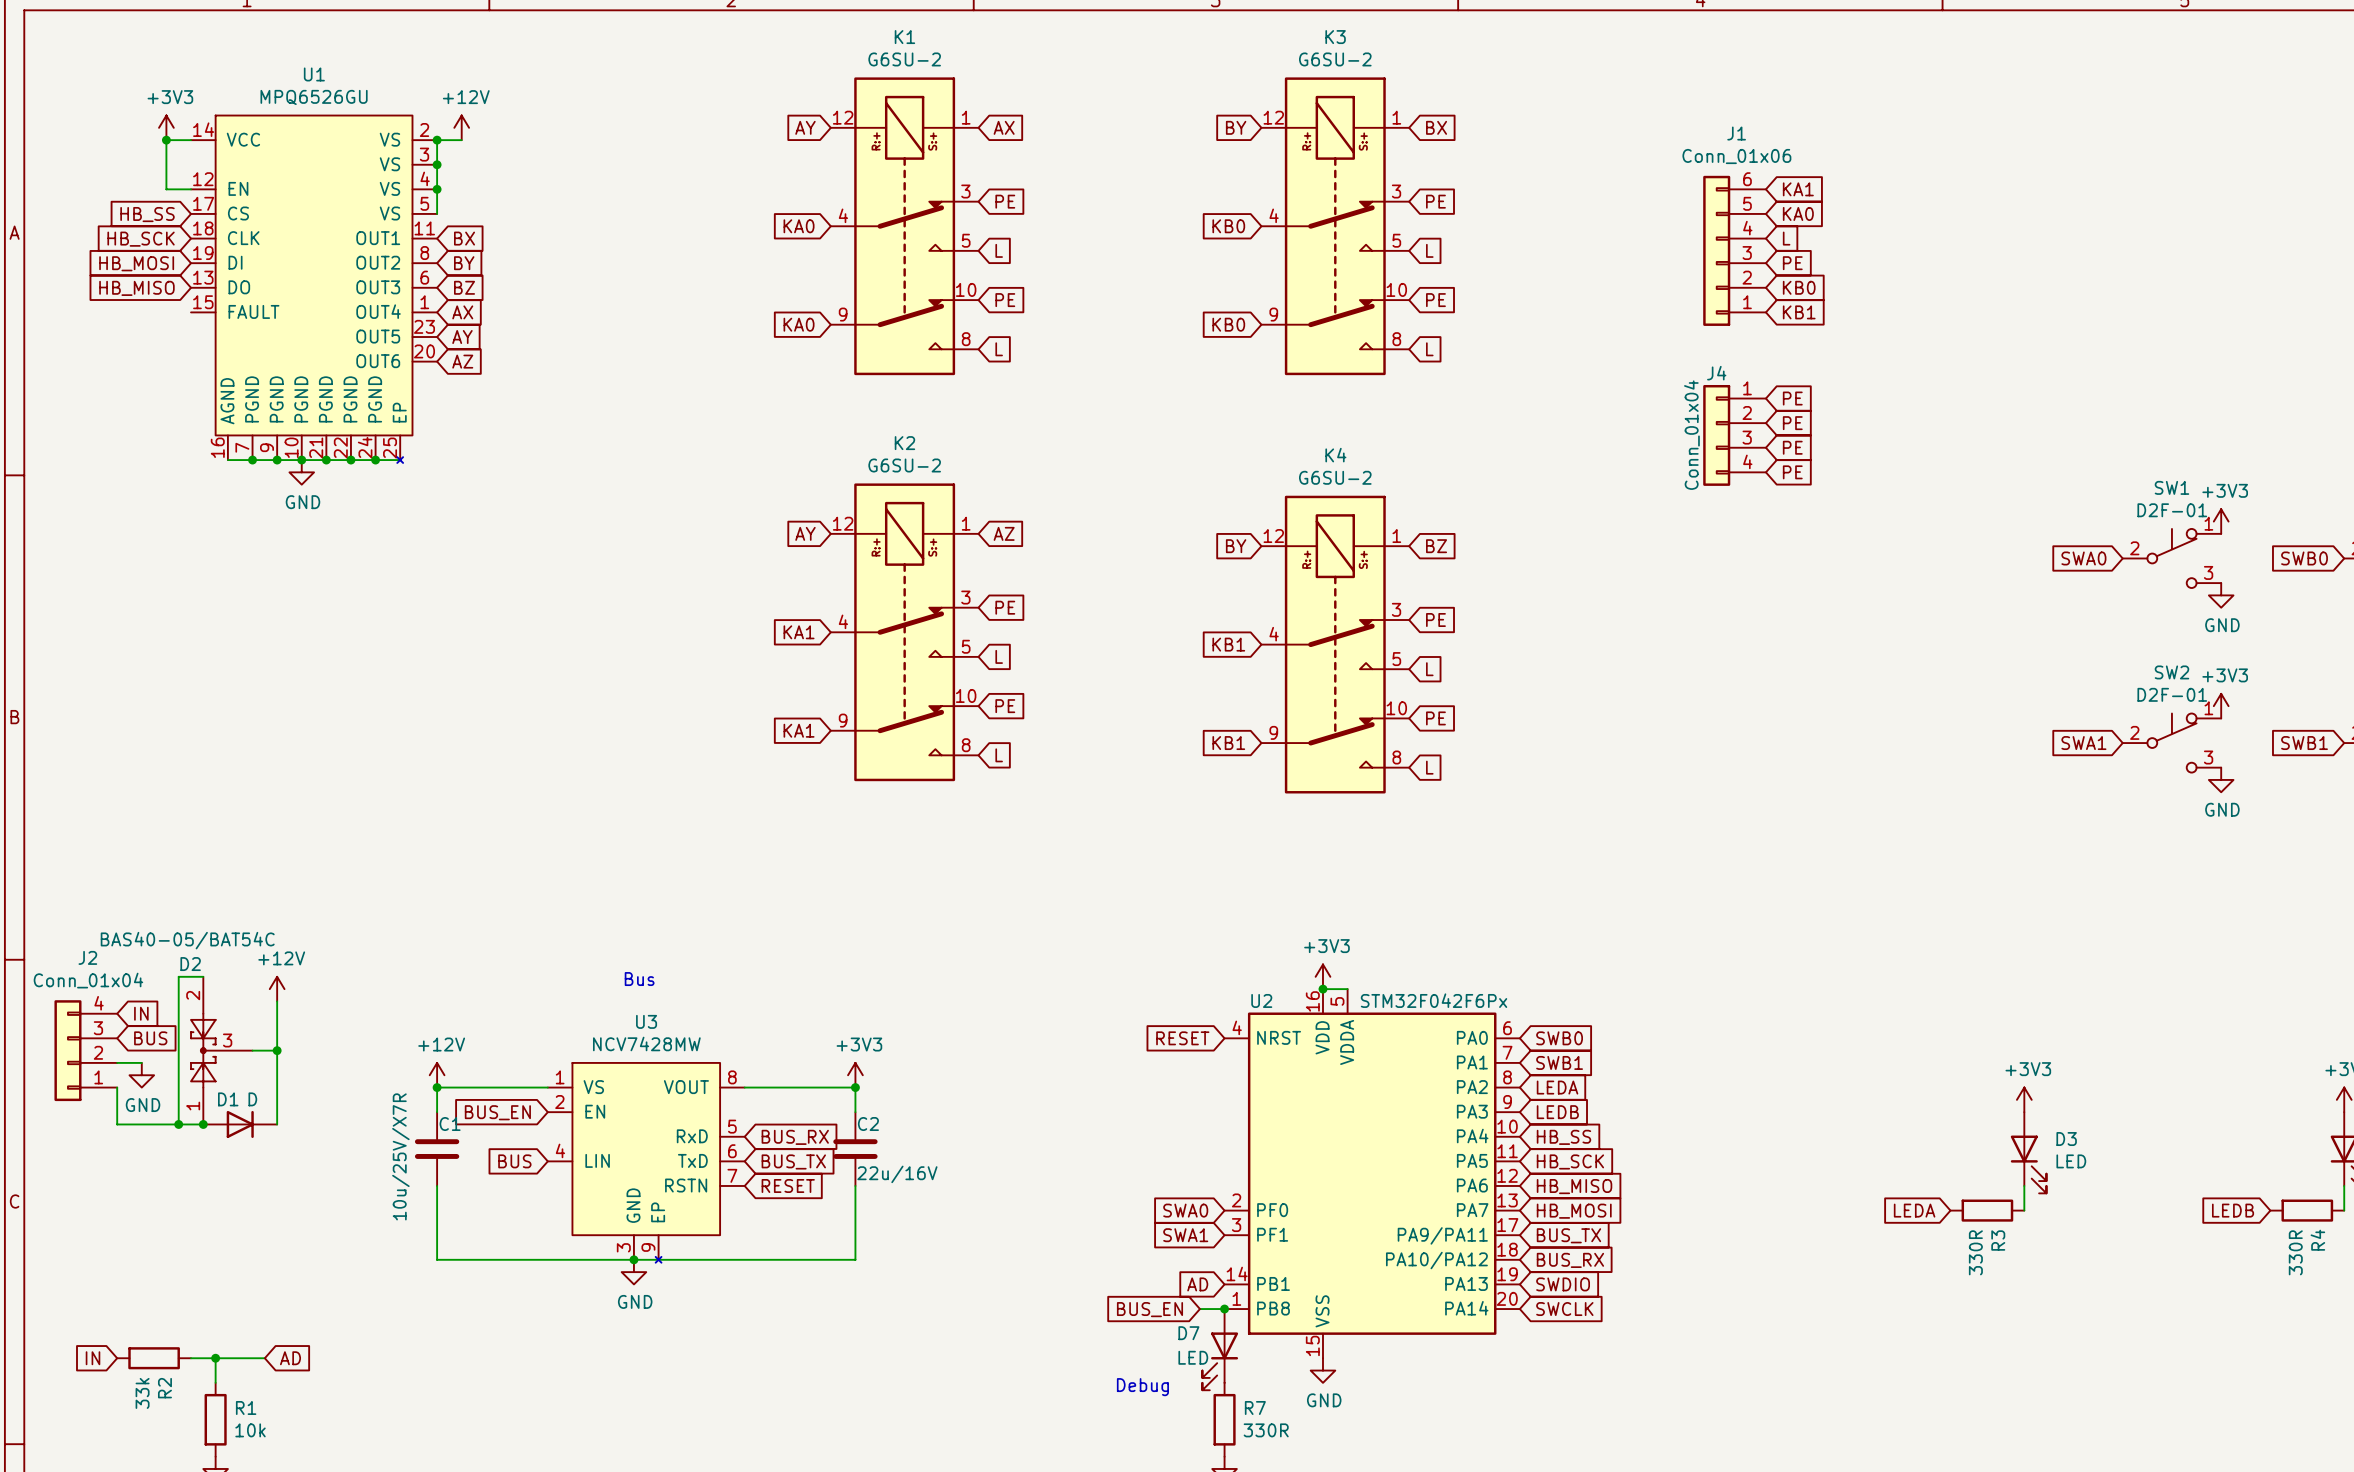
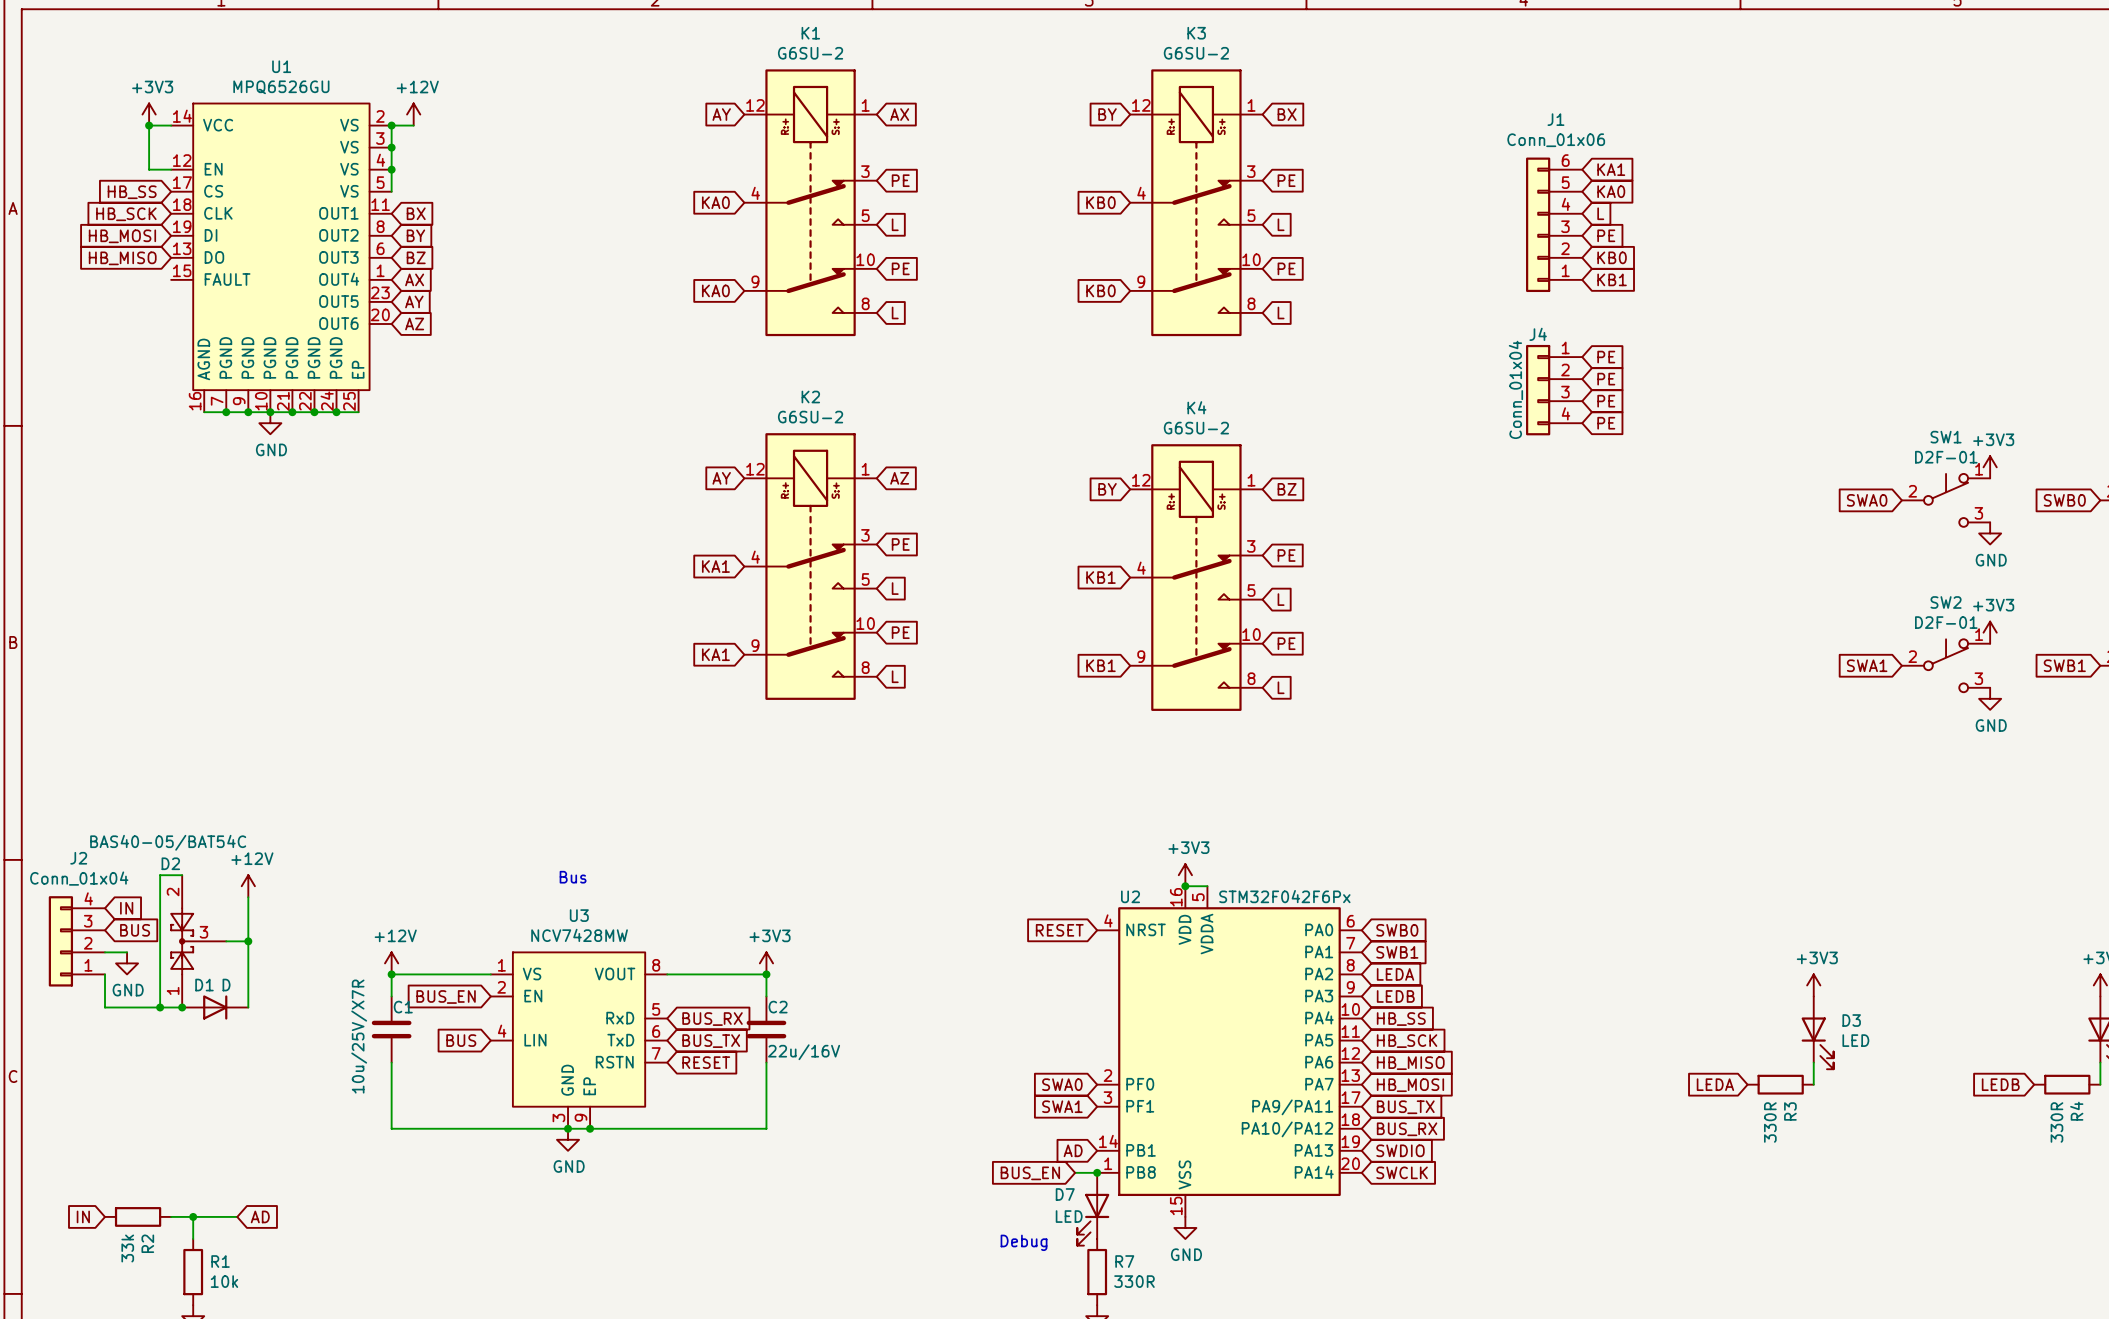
U1 symbol: [191, 115, 438, 463] -> [171, 103, 392, 413]
U3 symbol: [547, 1062, 745, 1263] -> [490, 952, 668, 1129]
junction: none -> (590, 1128)

